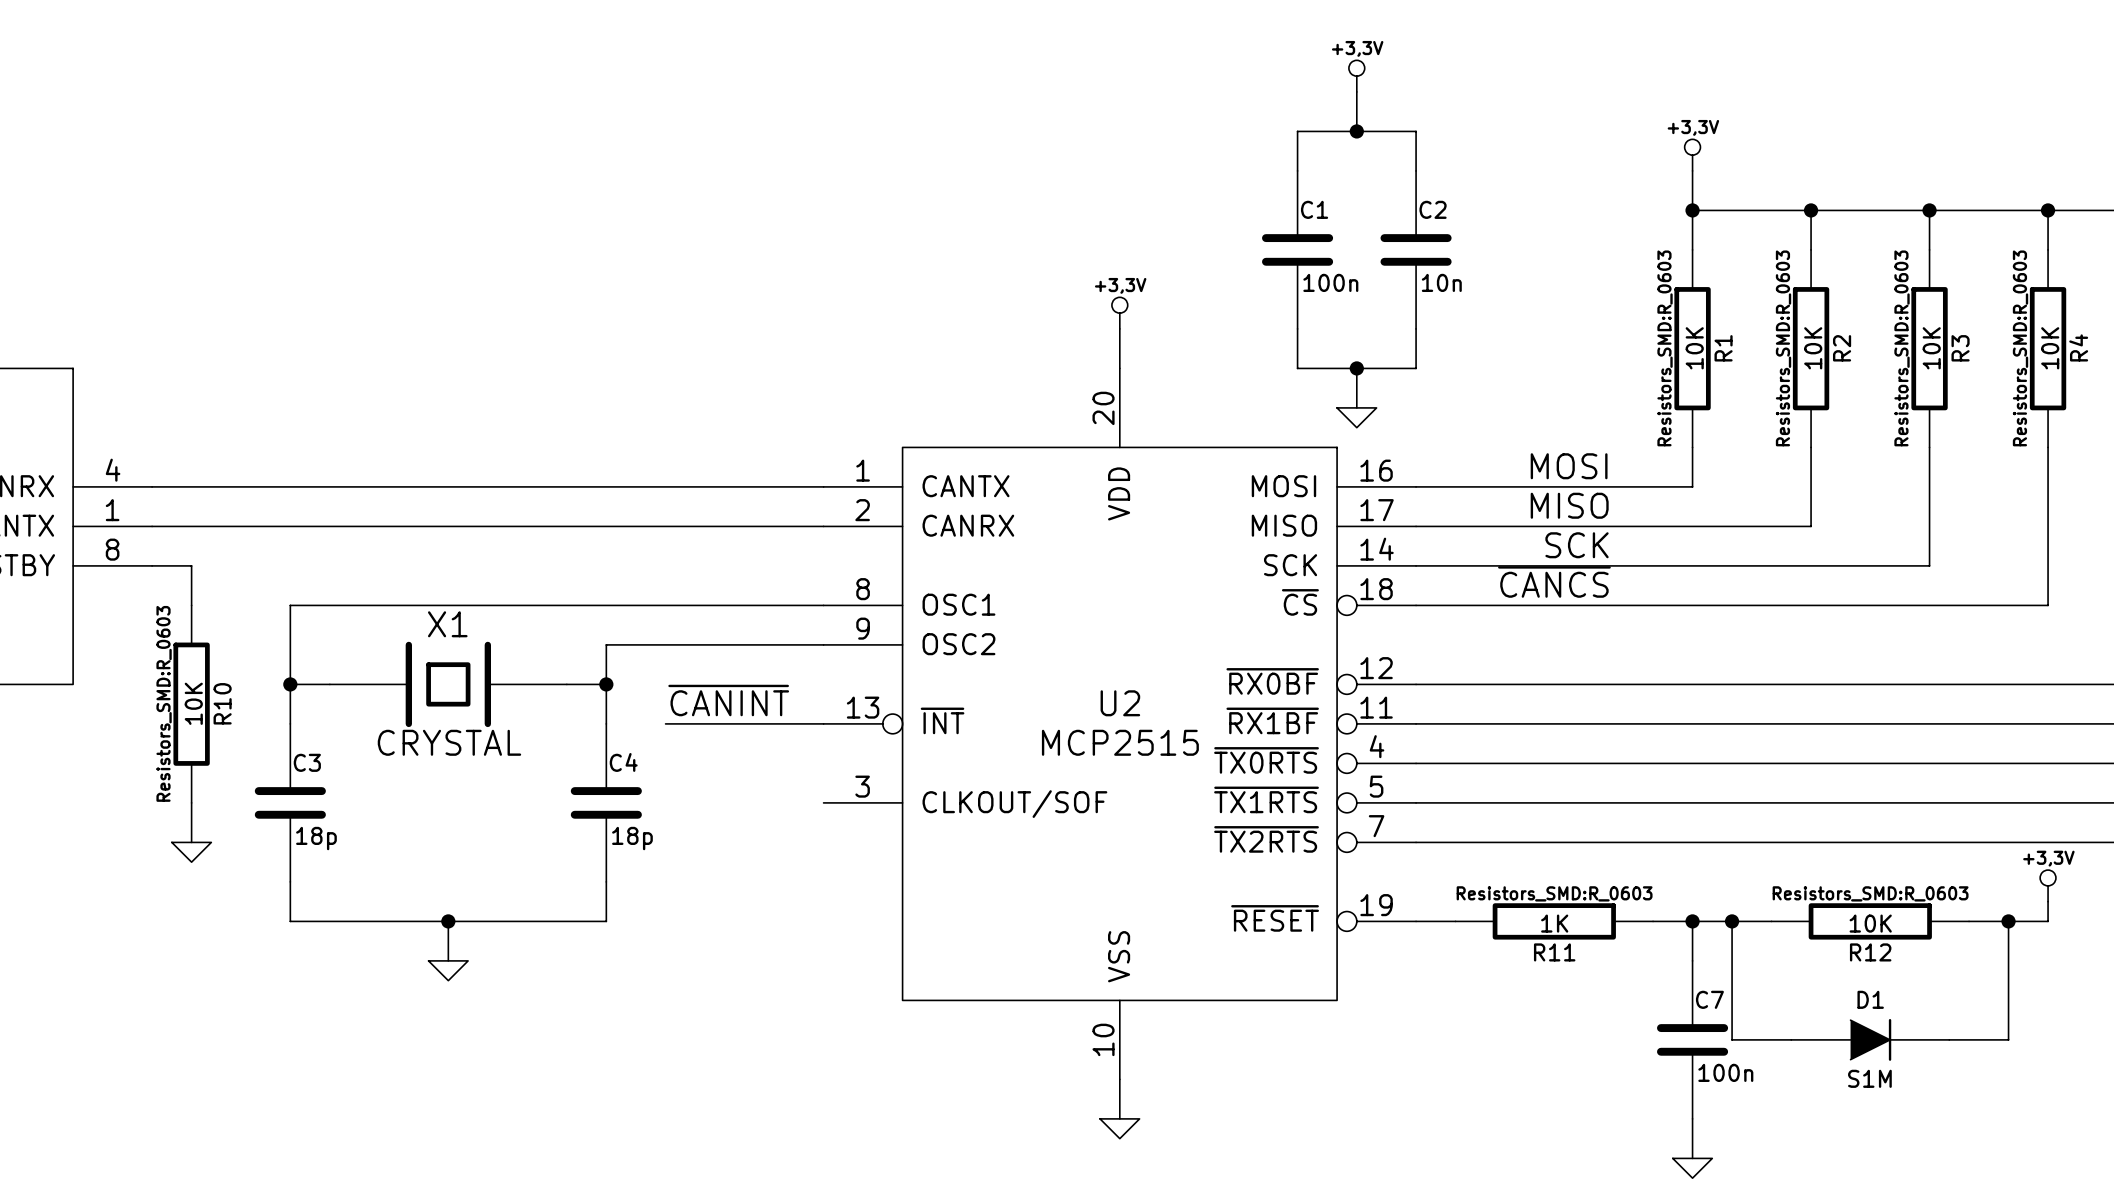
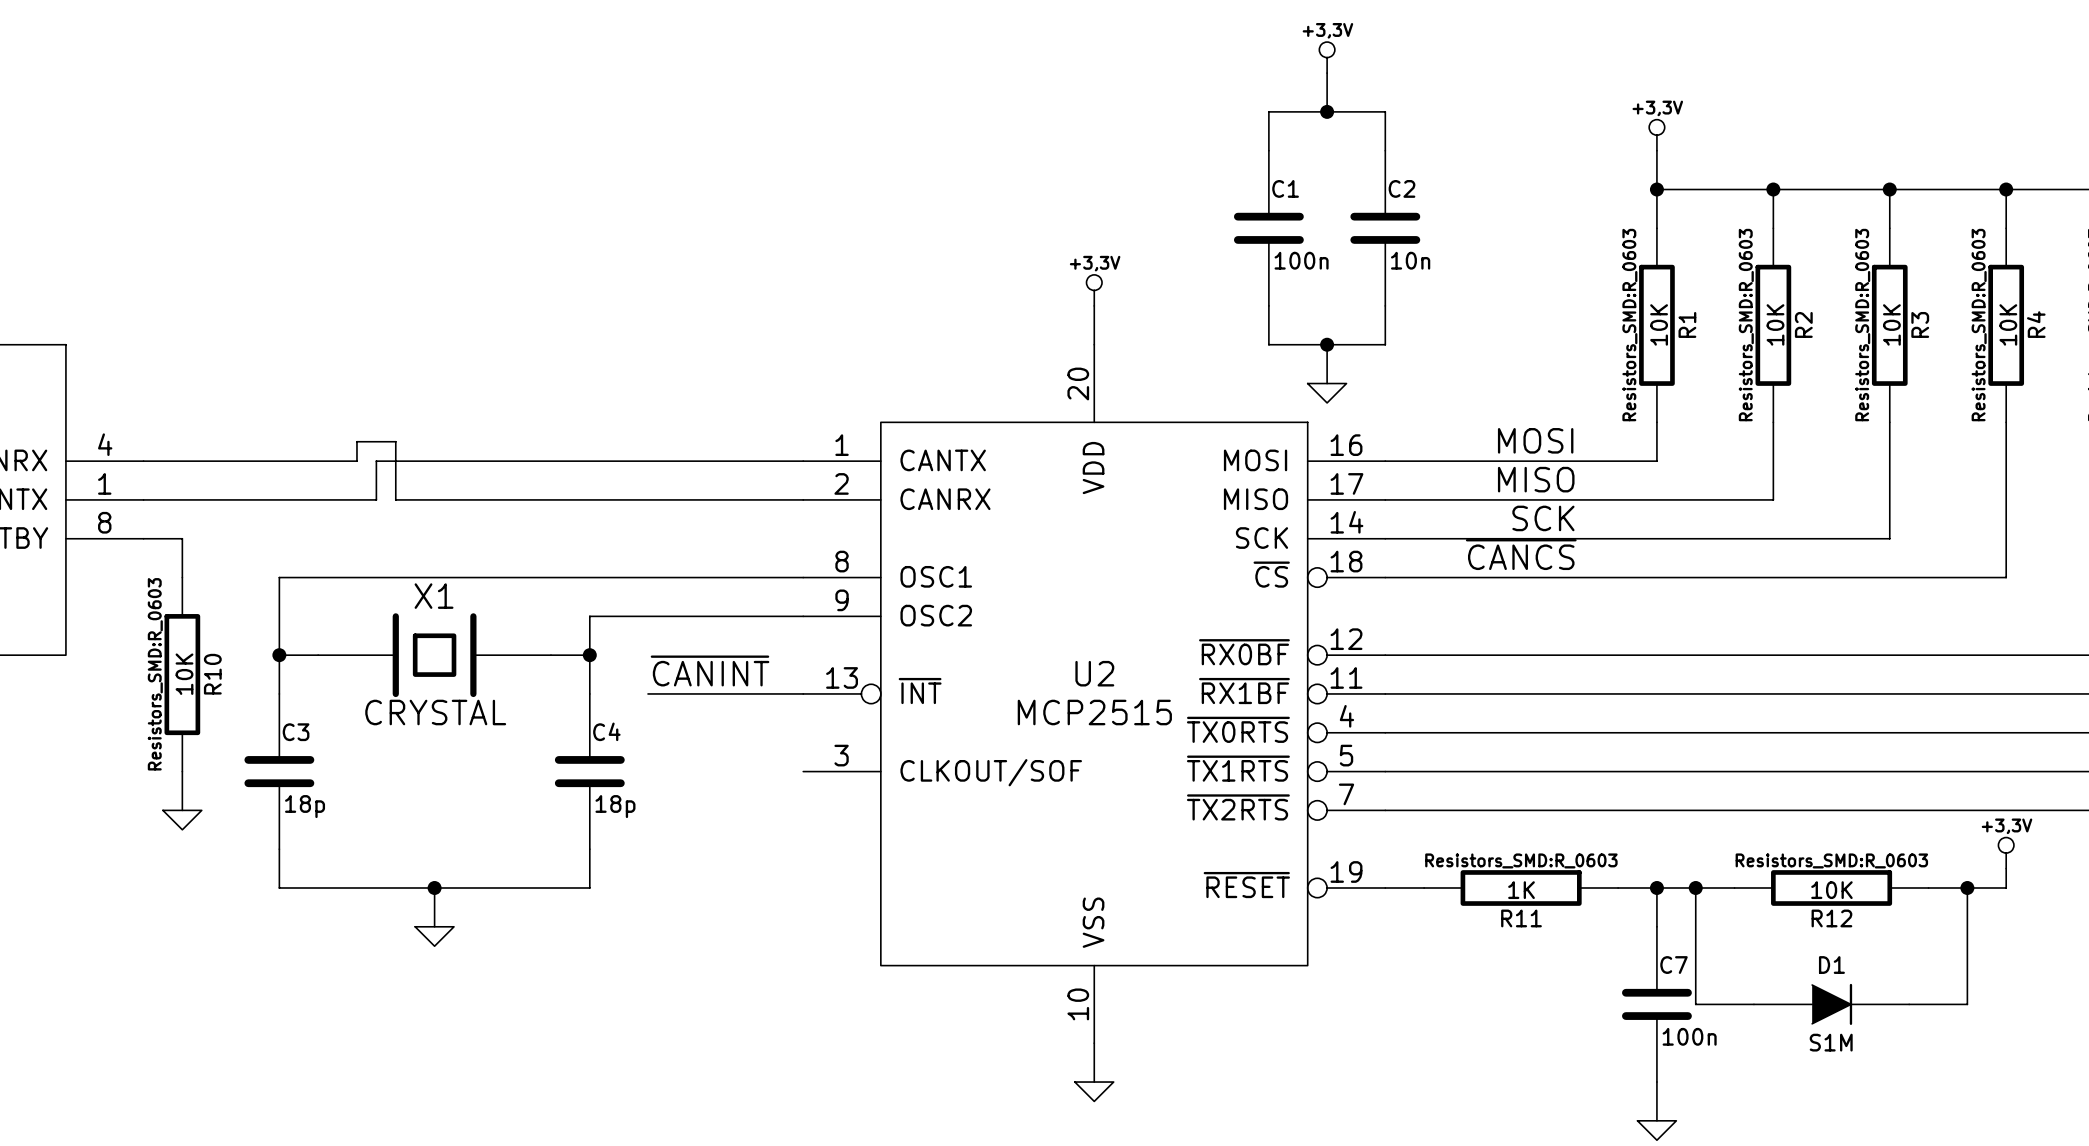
wire: (369, 486) (389, 486) -> (356, 461) (356, 441) (395, 441) (395, 499)
wire: (389, 526) (408, 526) -> (376, 499) (376, 461)

